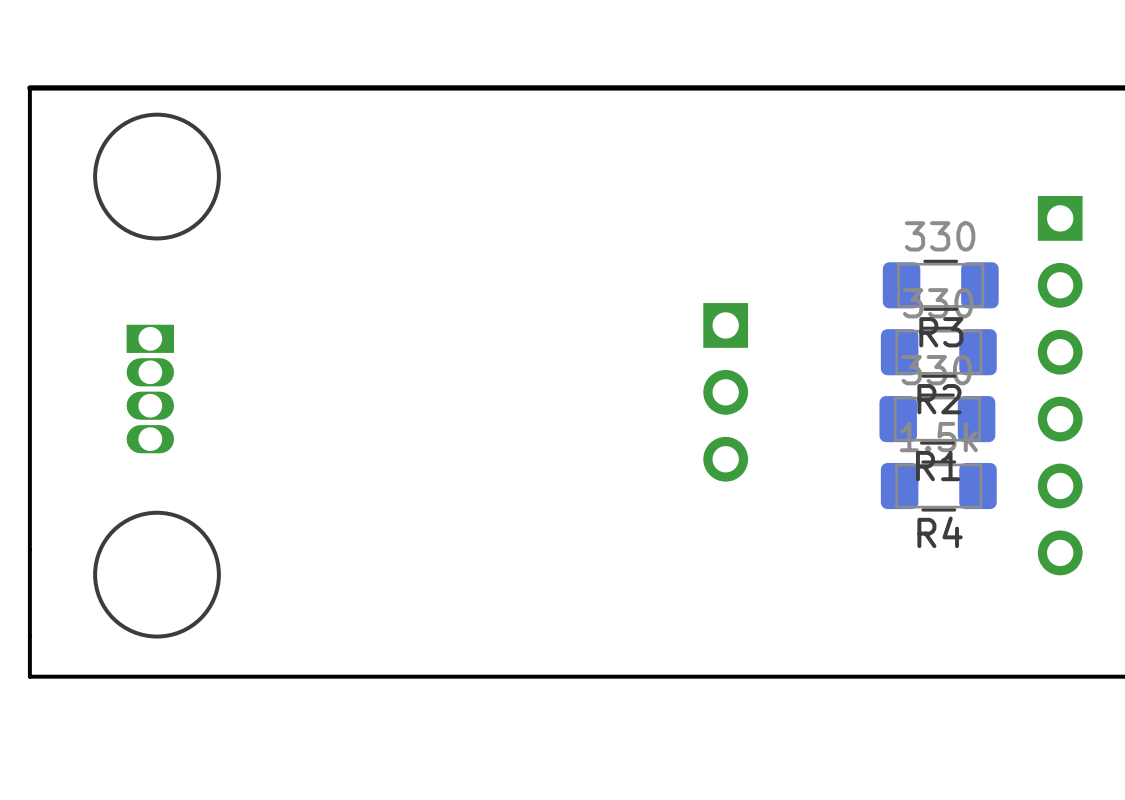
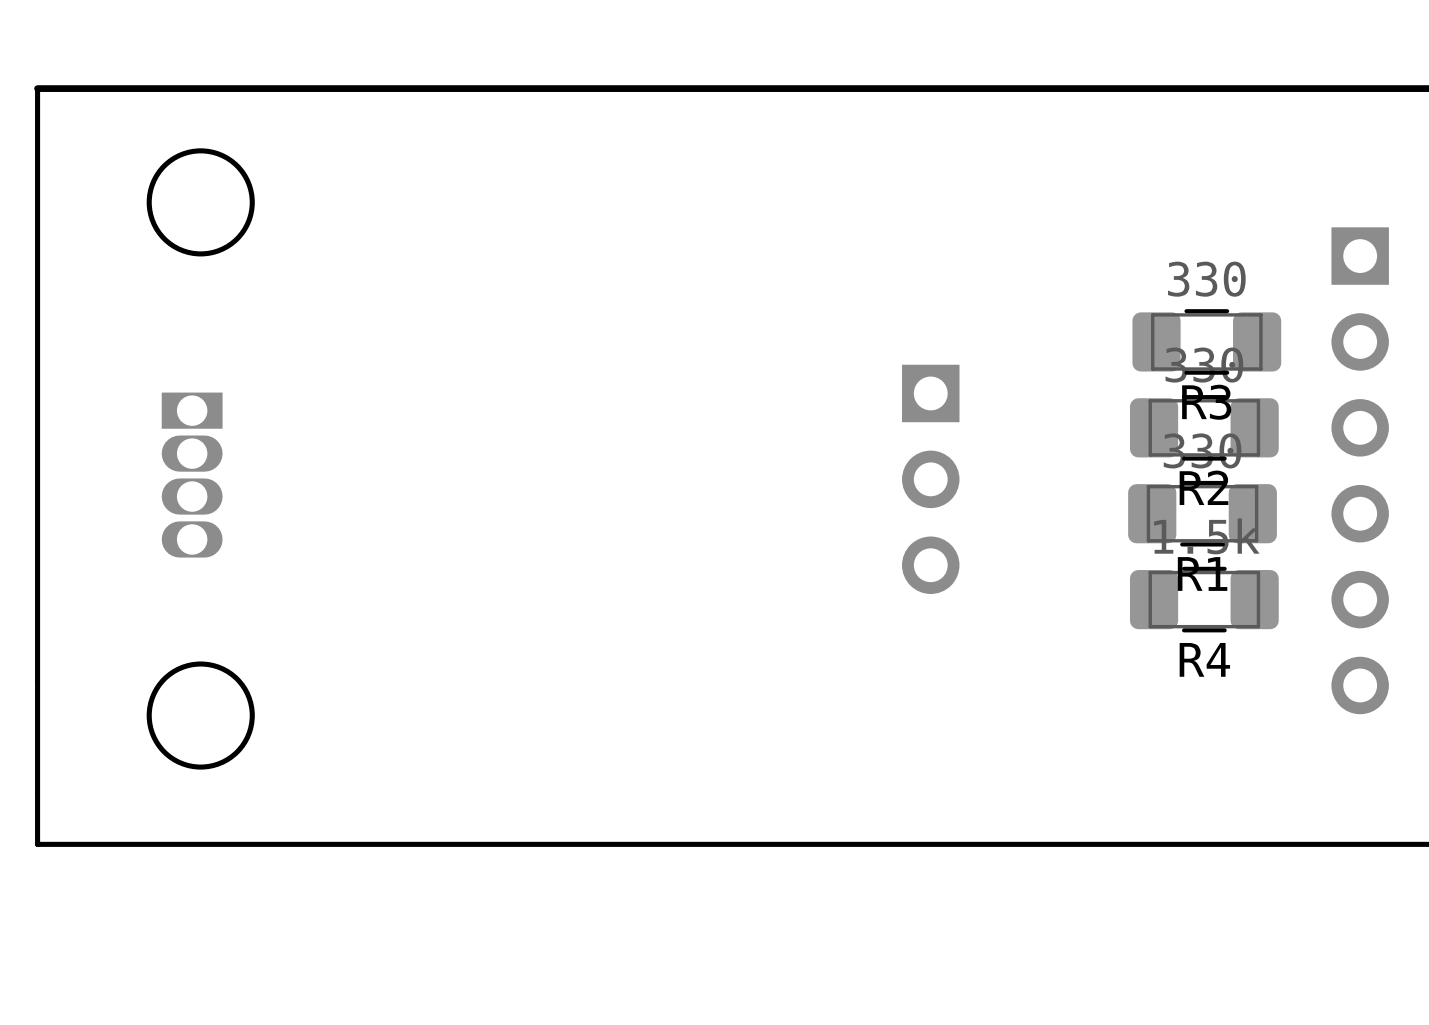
drawing shape: [93, 112, 221, 241] -> [146, 148, 255, 257]
drawing shape: [93, 510, 221, 639] -> [146, 661, 255, 770]

